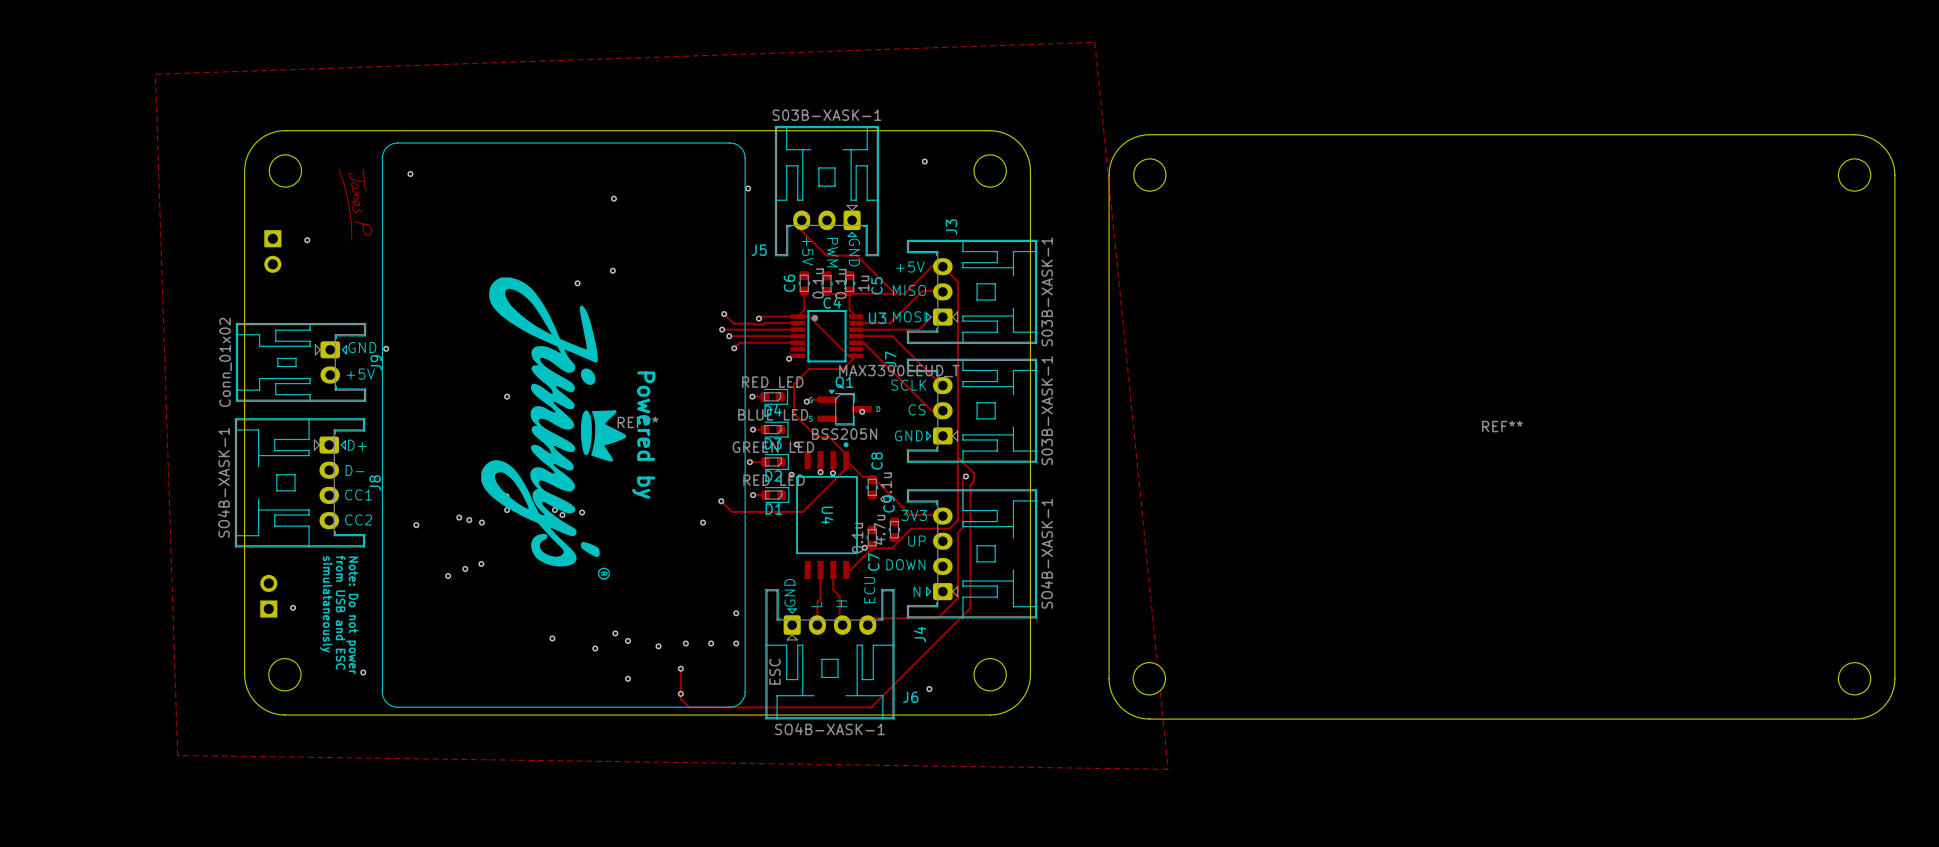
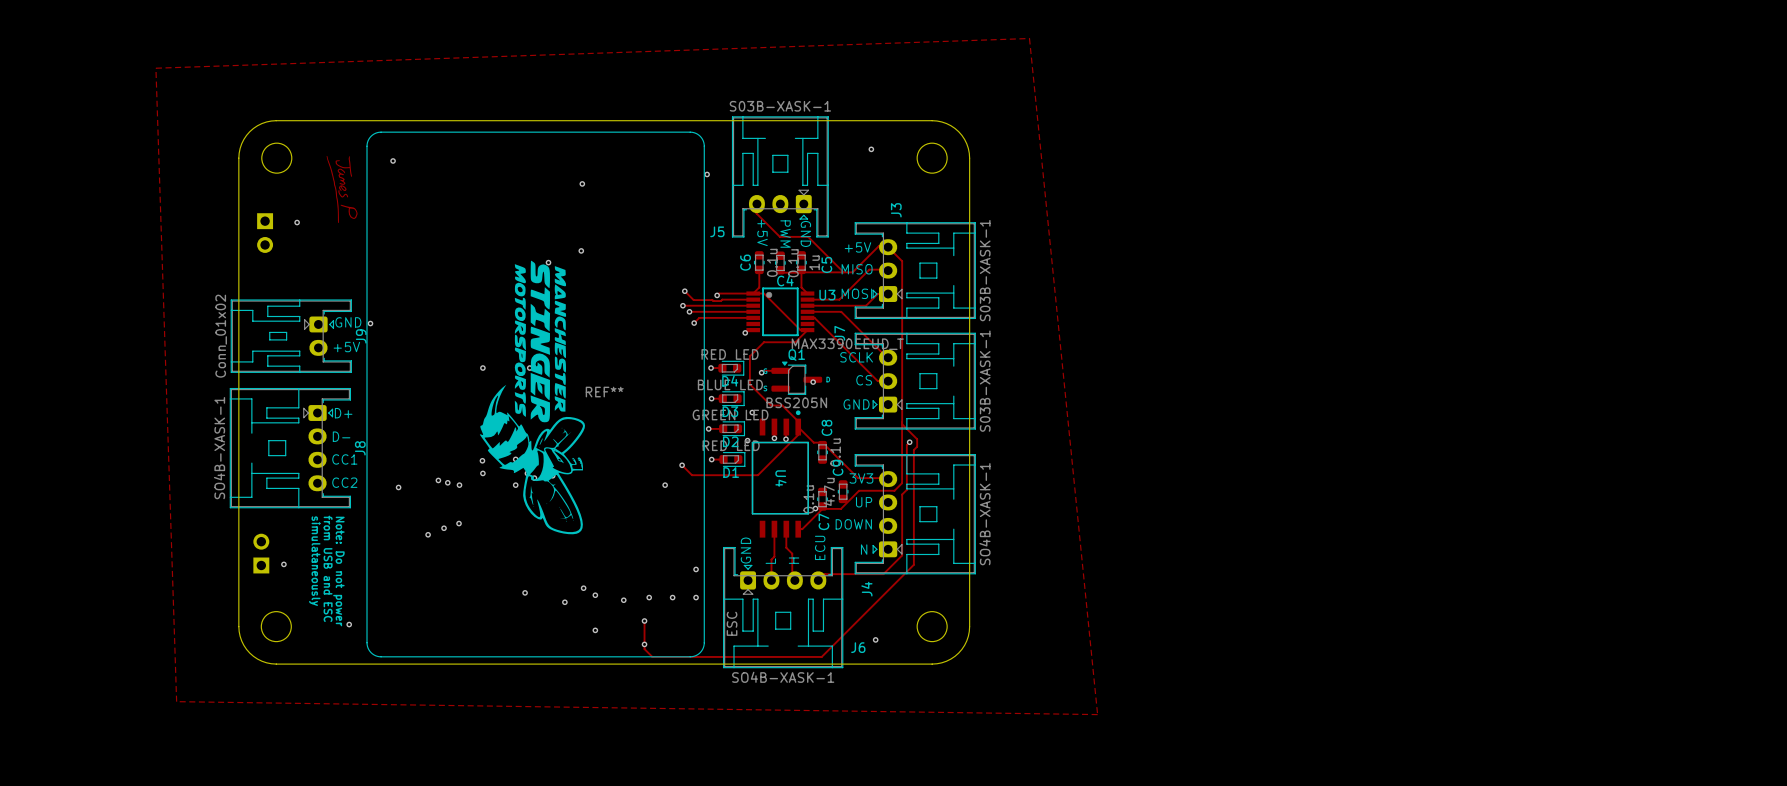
drawing shape: [481, 277, 627, 580] -> [479, 260, 586, 535]
REF**: (1501, 426) -> none
text: Powered by (643, 435) -> none

